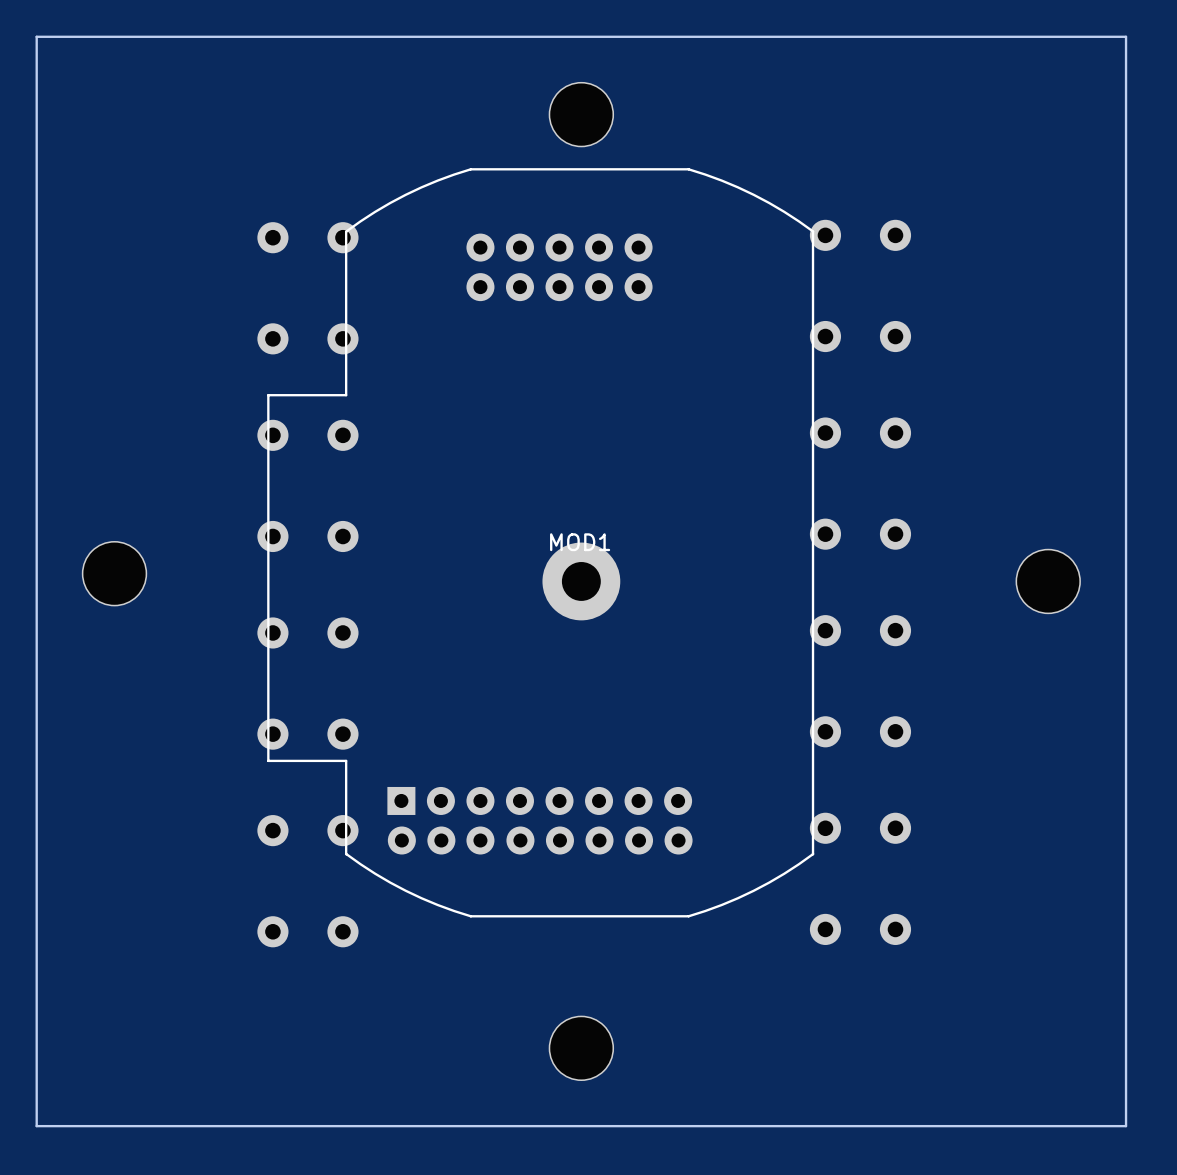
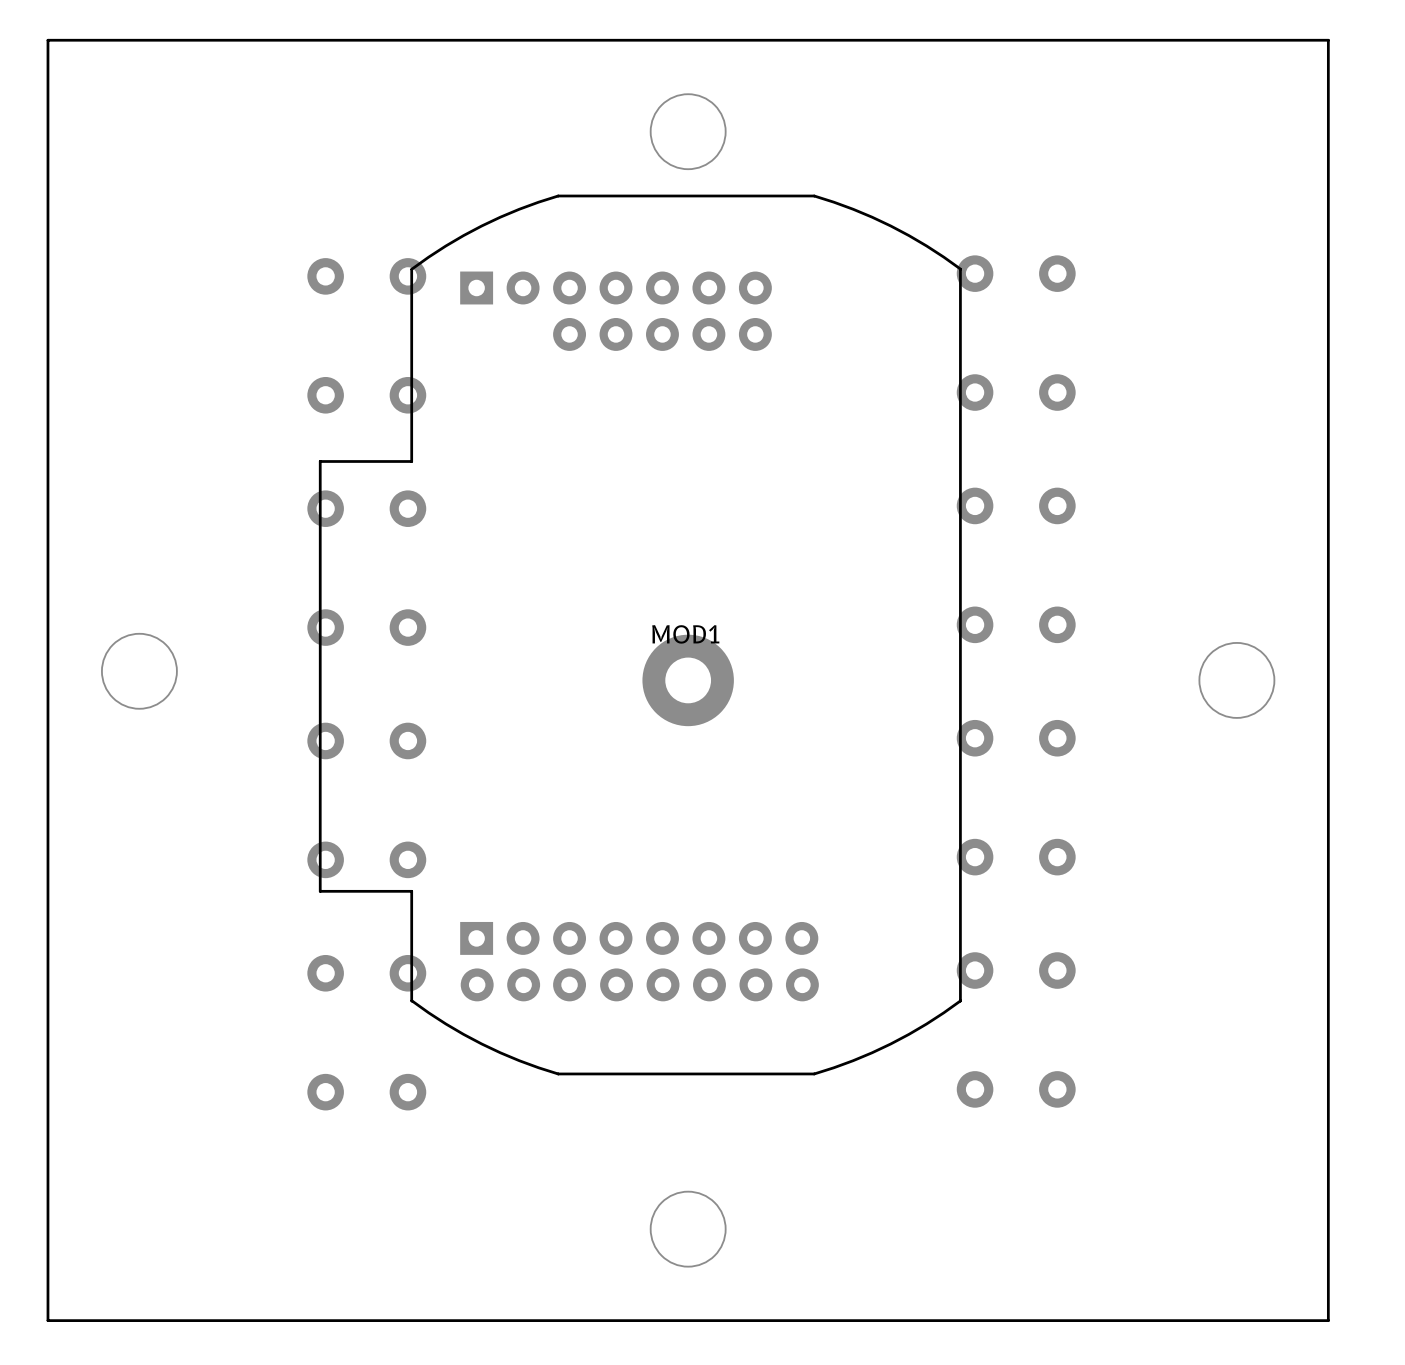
MOD1 footprint: [267, 168, 815, 918] -> [318, 194, 962, 1076]

